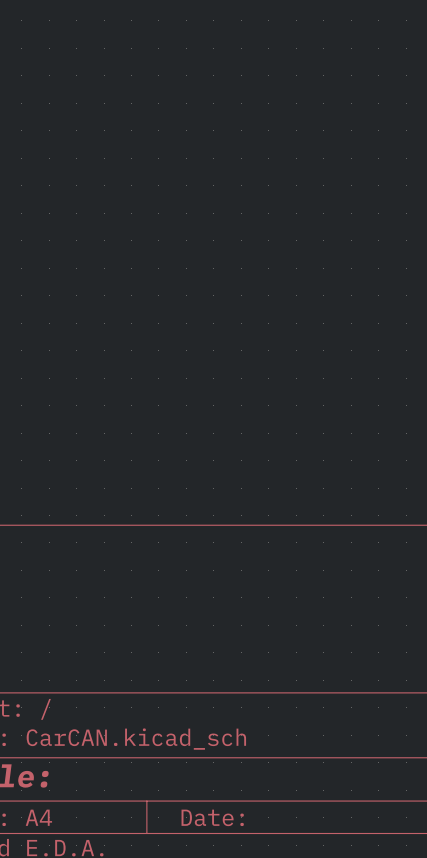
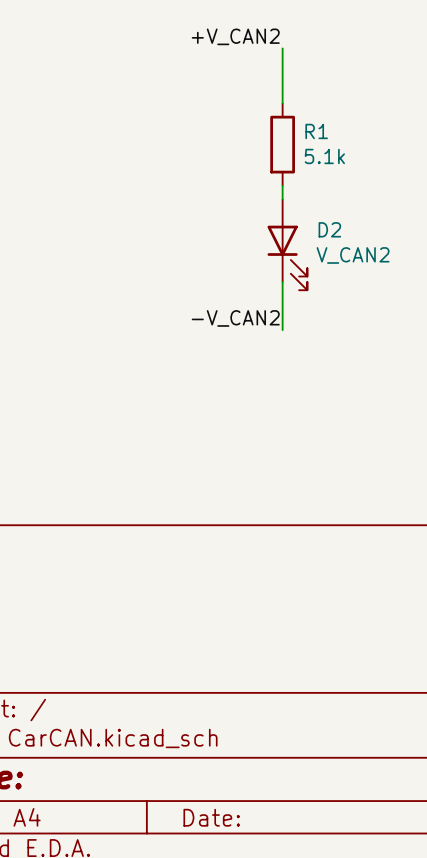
label: none -> +V_CAN2 (235, 36)
wire: none -> (282, 48) (282, 103)
R1: none -> 5.1k (282, 144)
wire: none -> (282, 185) (282, 199)
D2: none -> V_CAN2 (287, 244)
wire: none -> (282, 281) (282, 330)
label: none -> -V_CAN2 (235, 318)

